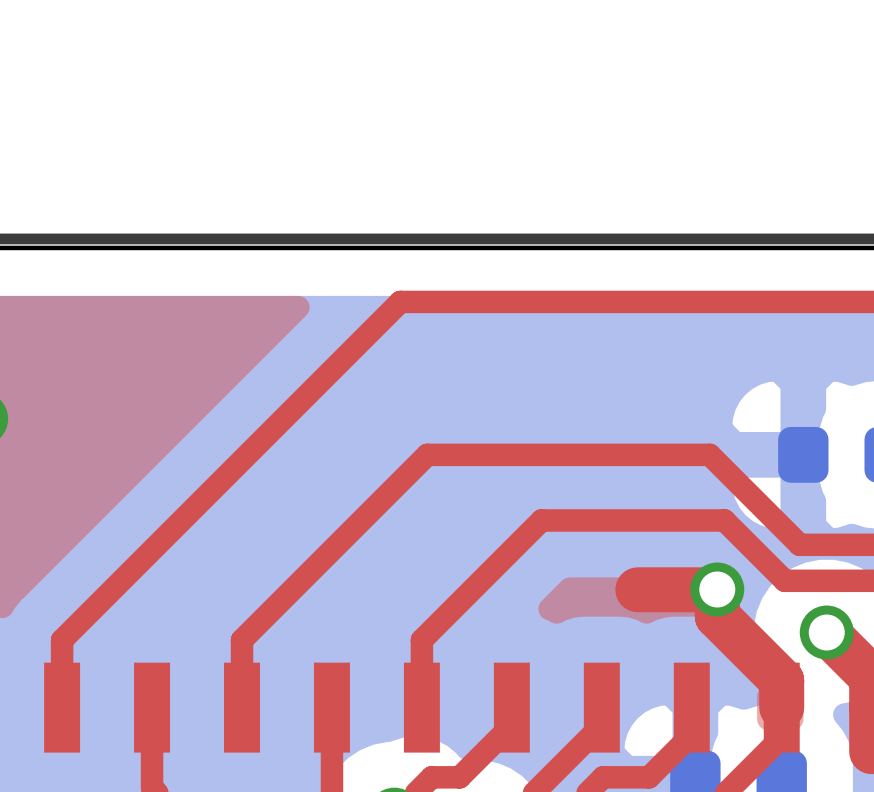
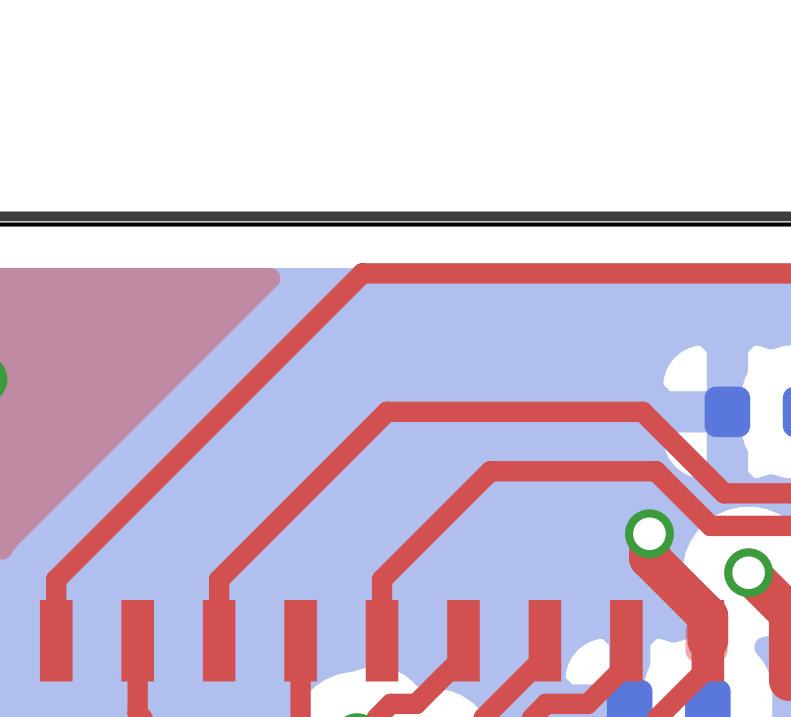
top track: (637, 589) (716, 589) -> none

